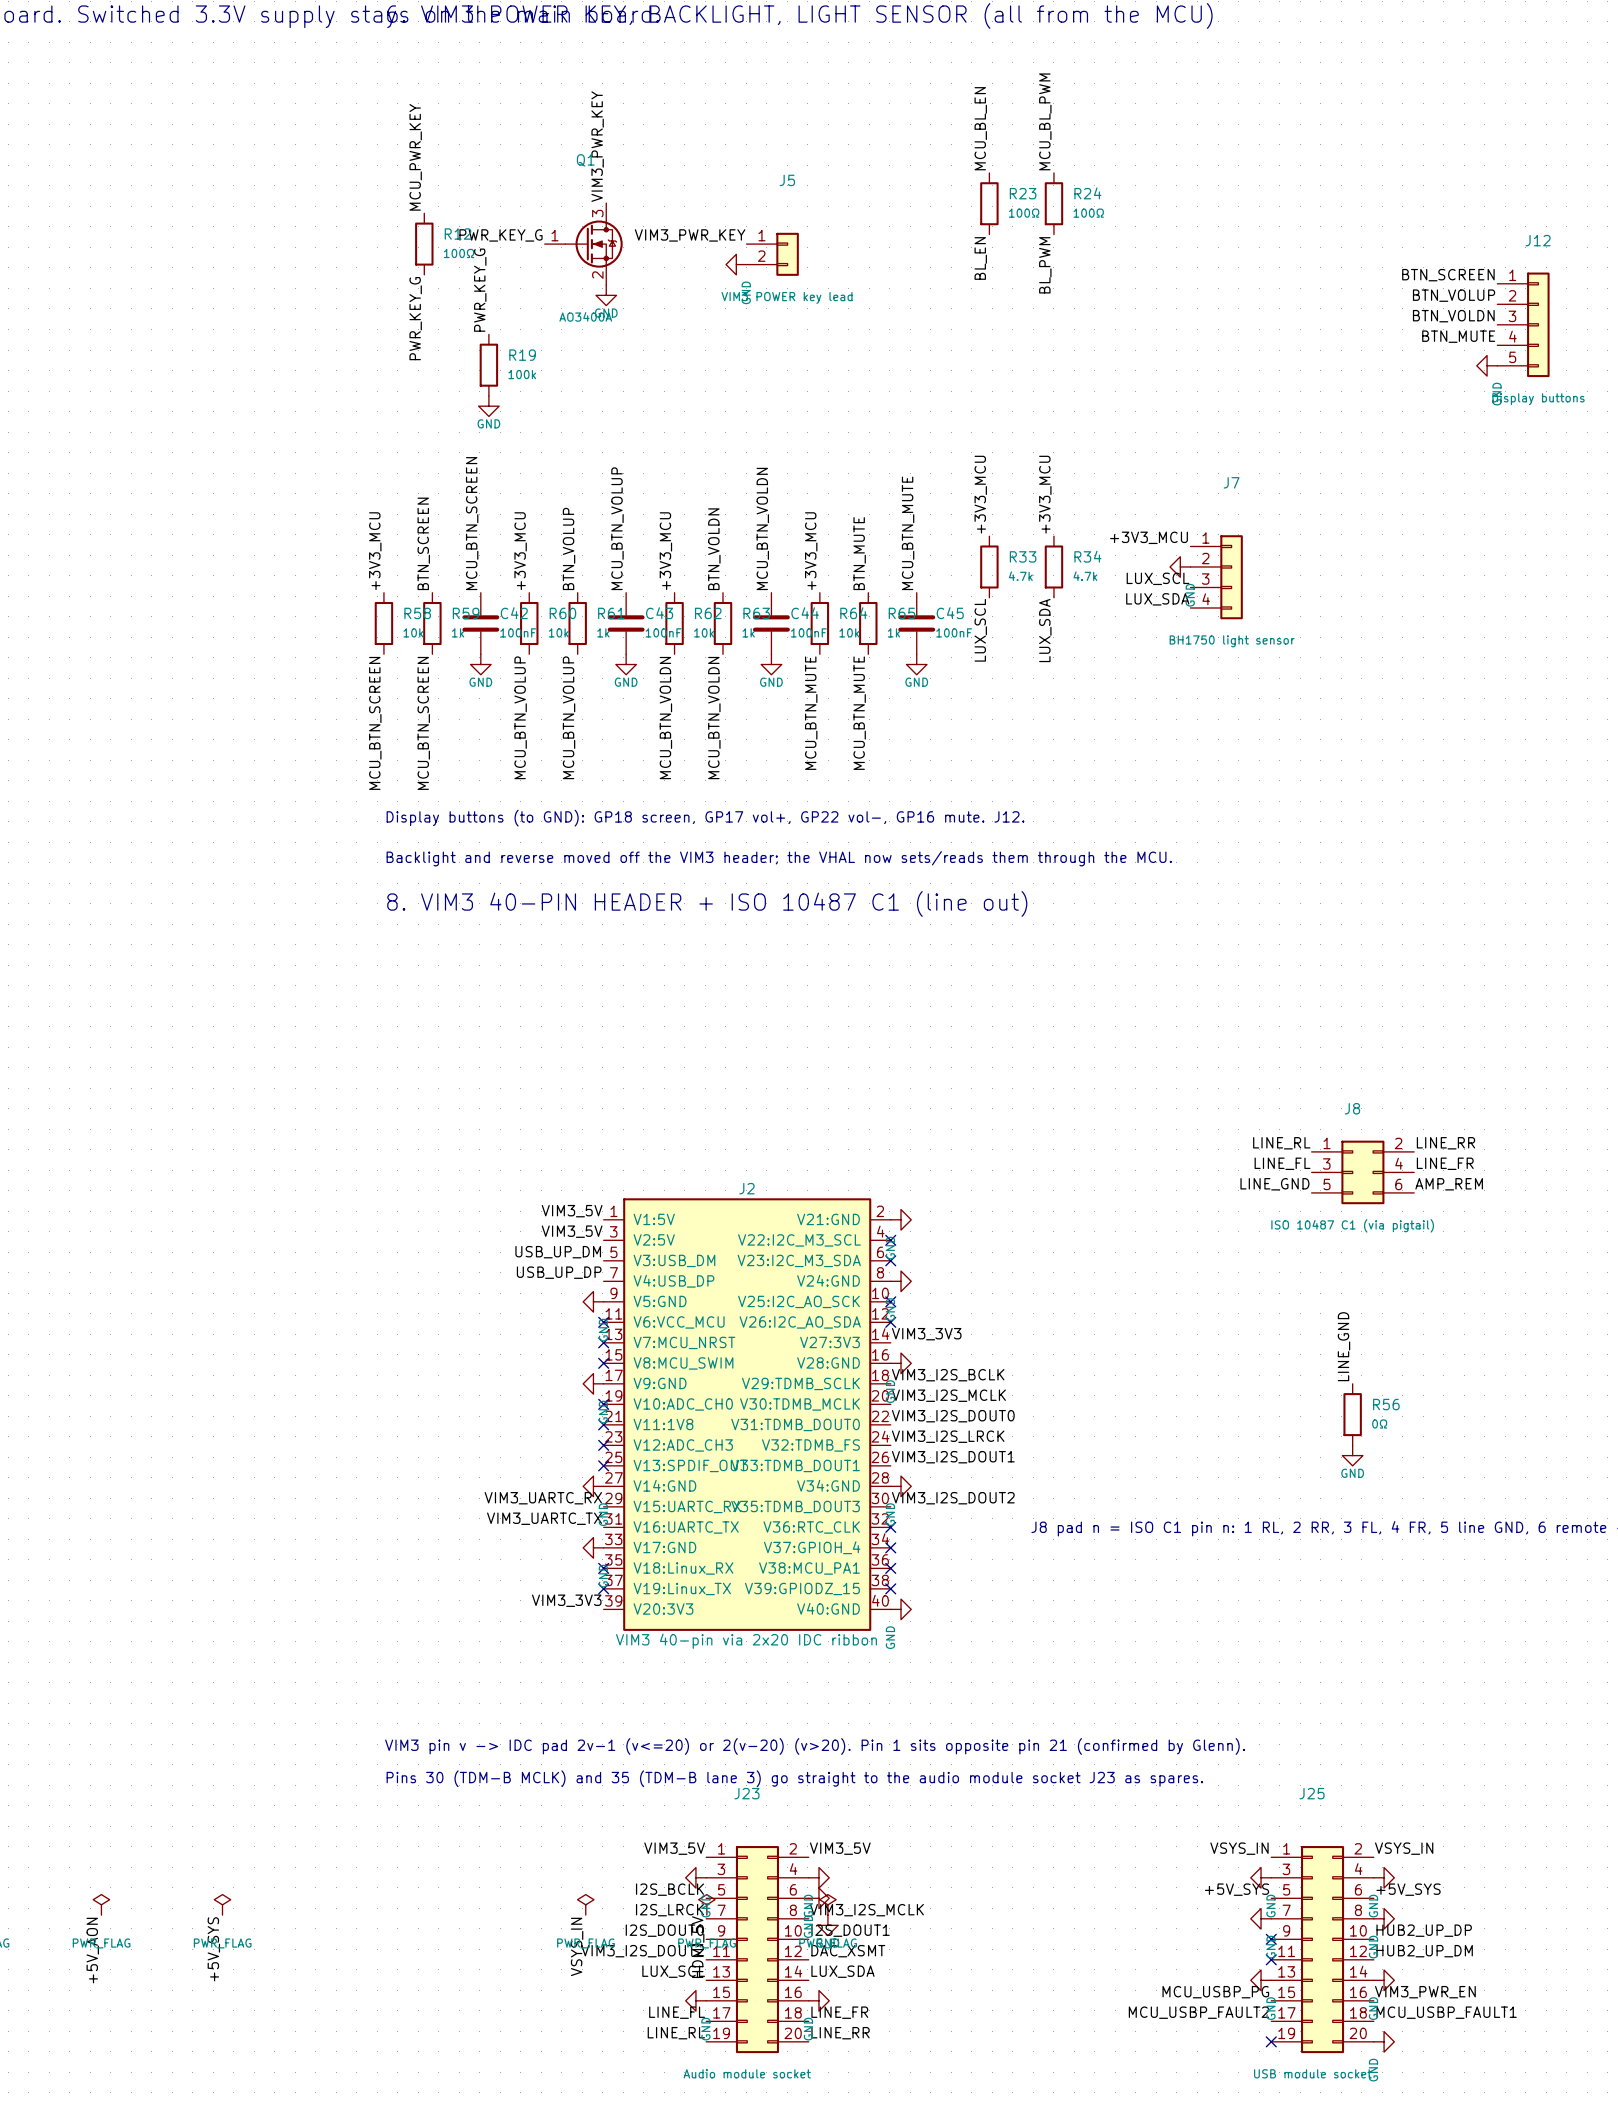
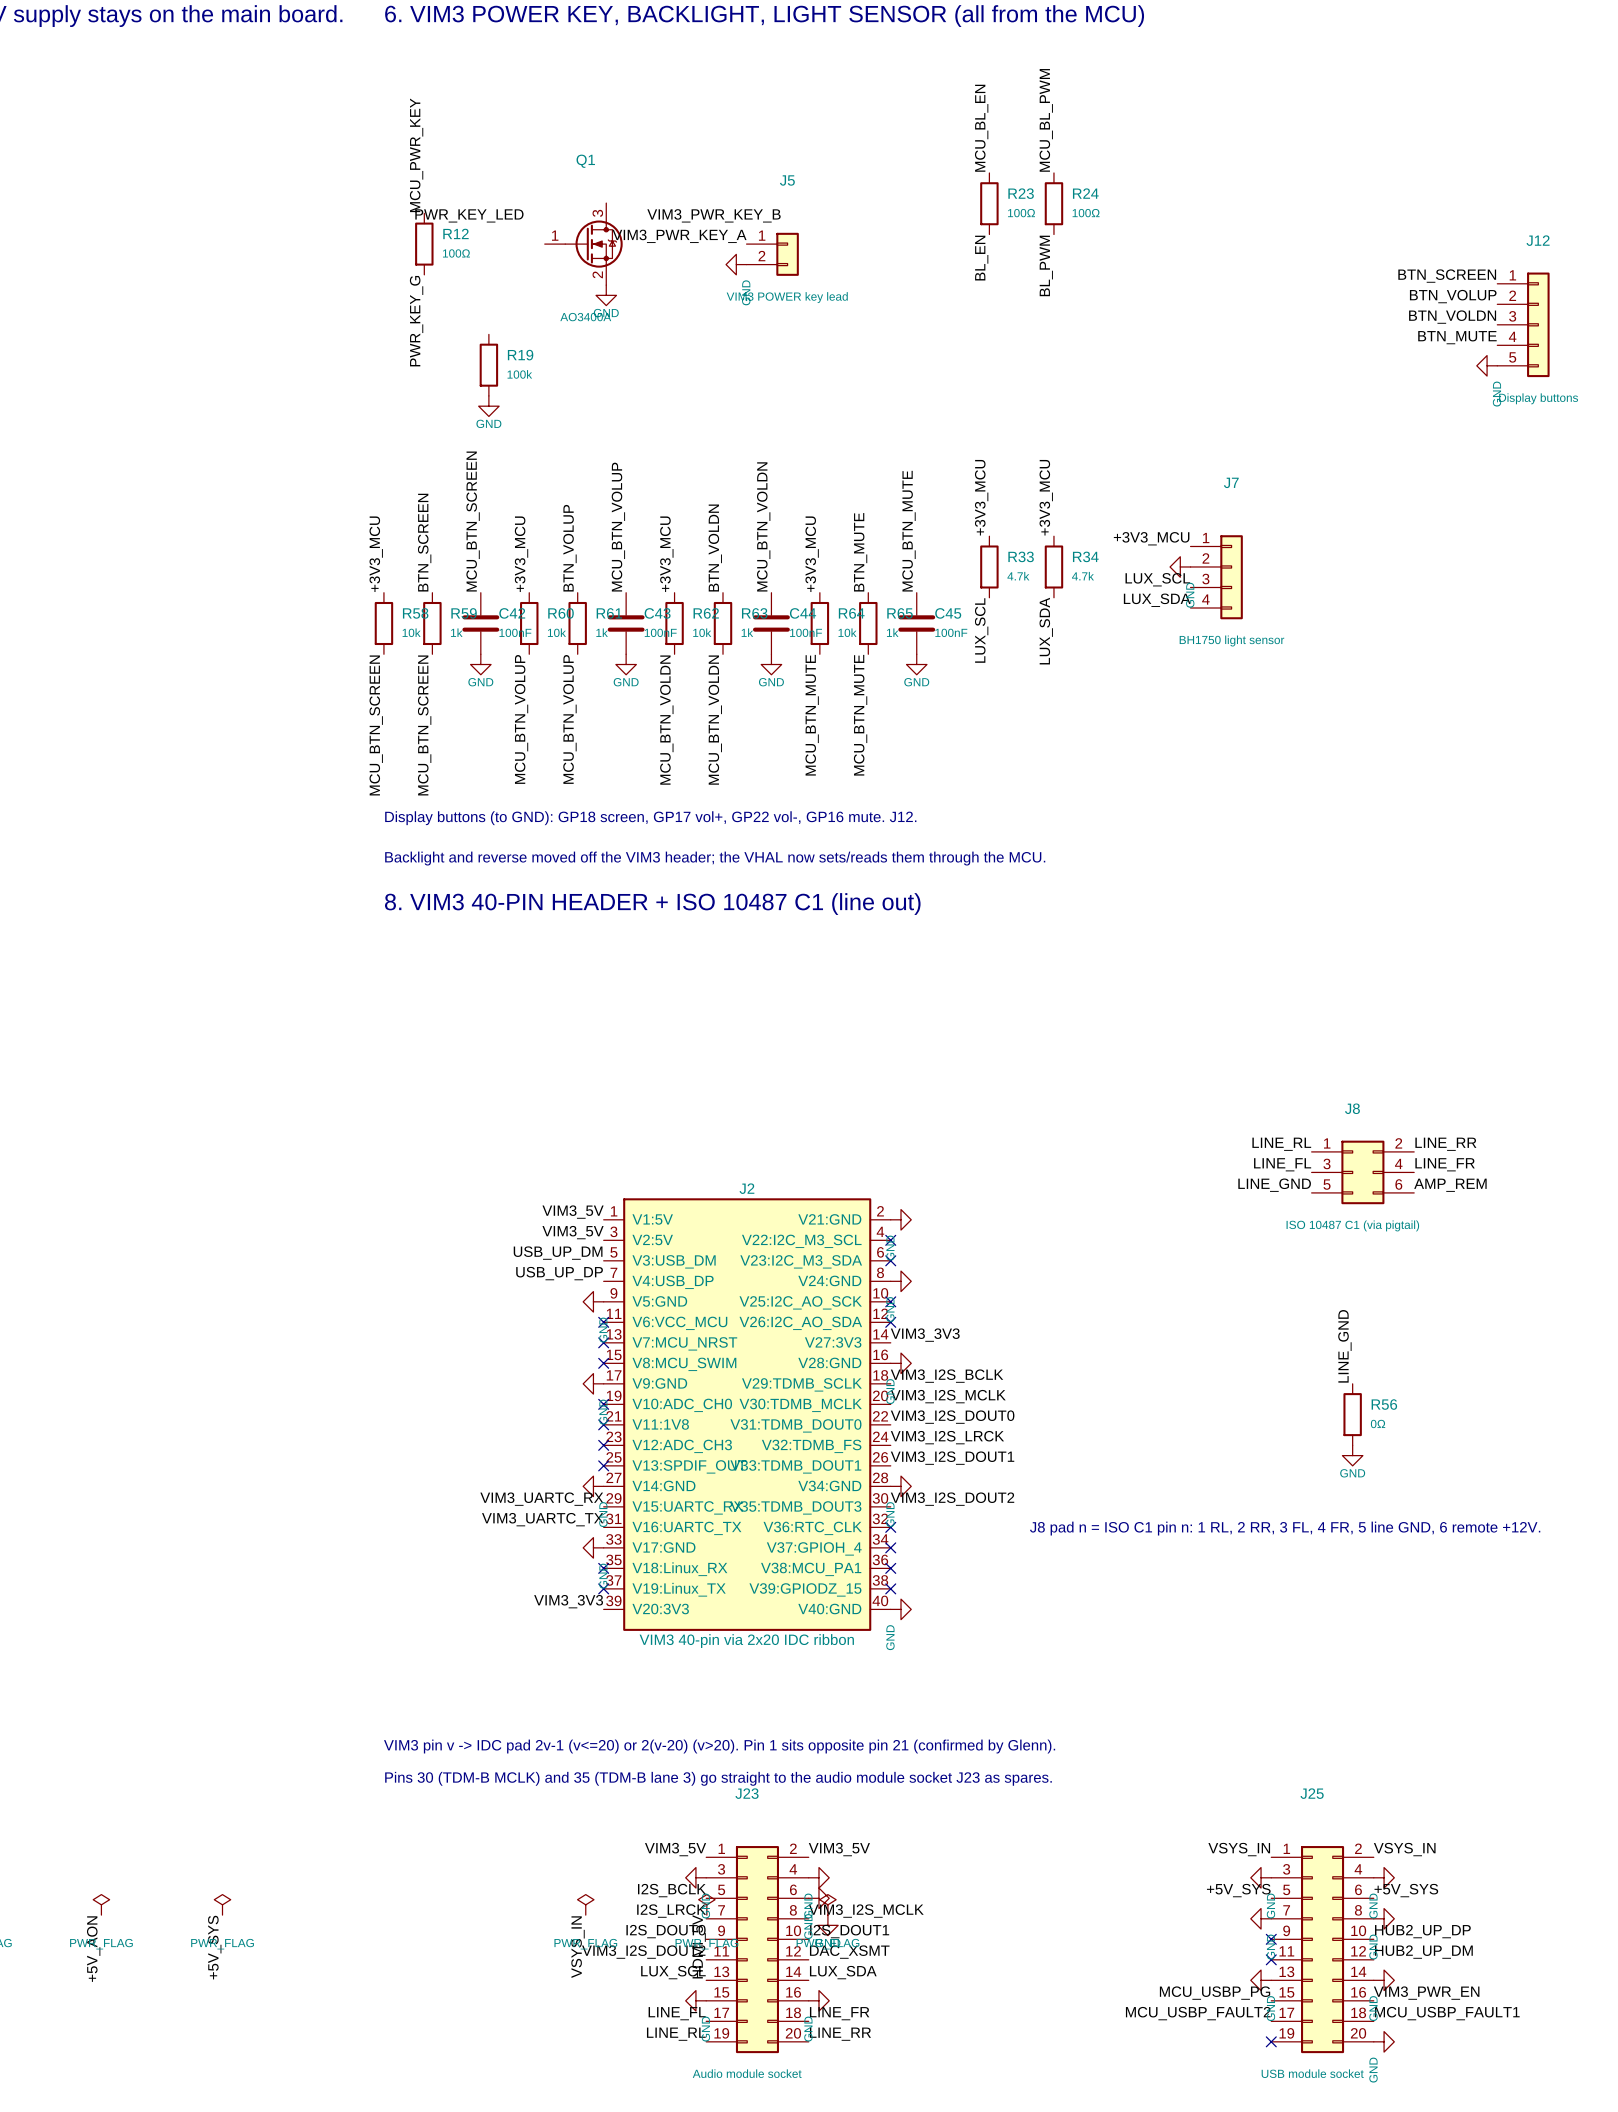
label: VIM3_PWR_KEY (597, 146) -> none
label: none -> VIM3_PWR_KEY_B (714, 215)
label: PWR_KEY_G (500, 235) -> PWR_KEY_LED (469, 215)
label: VIM3_PWR_KEY (690, 235) -> VIM3_PWR_KEY_A (679, 236)
label: PWR_KEY_G (480, 290) -> none

